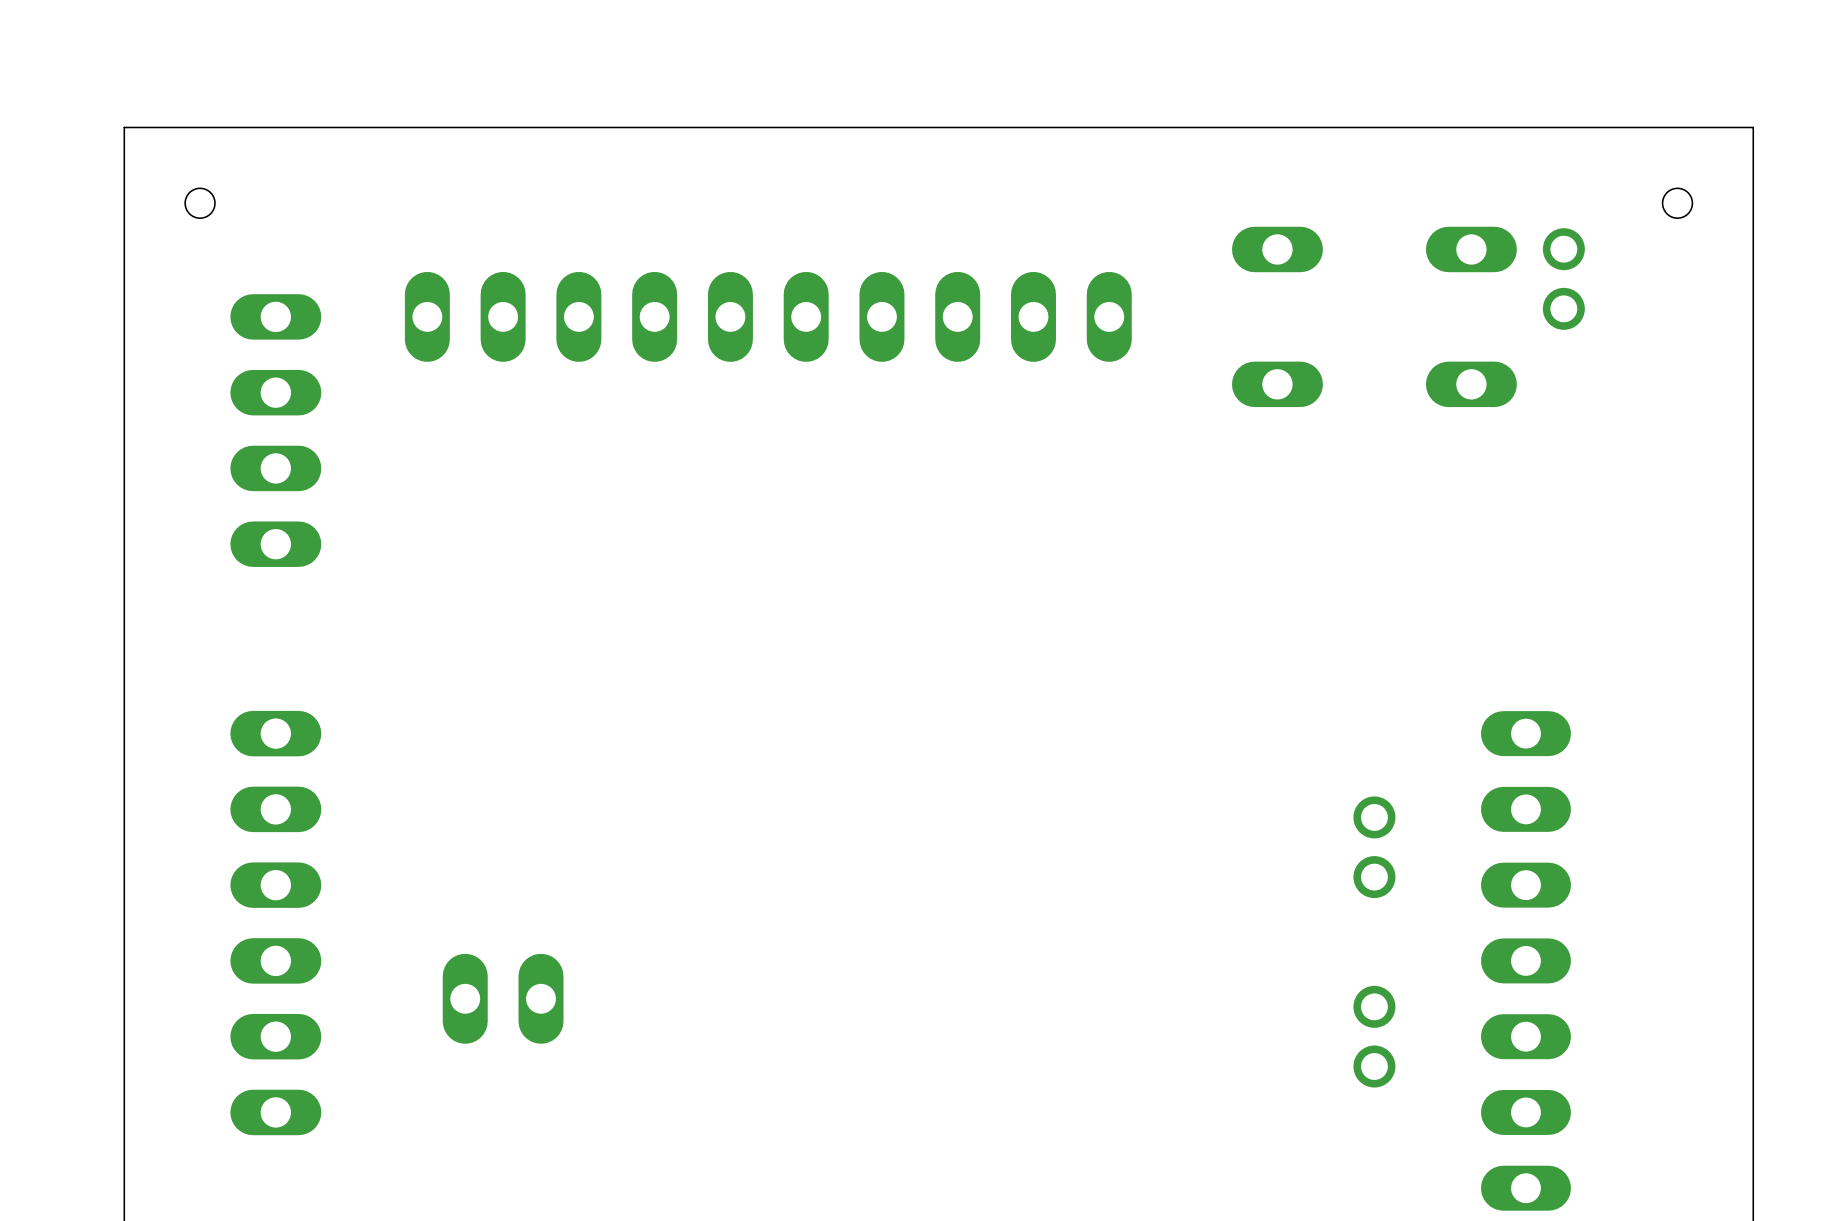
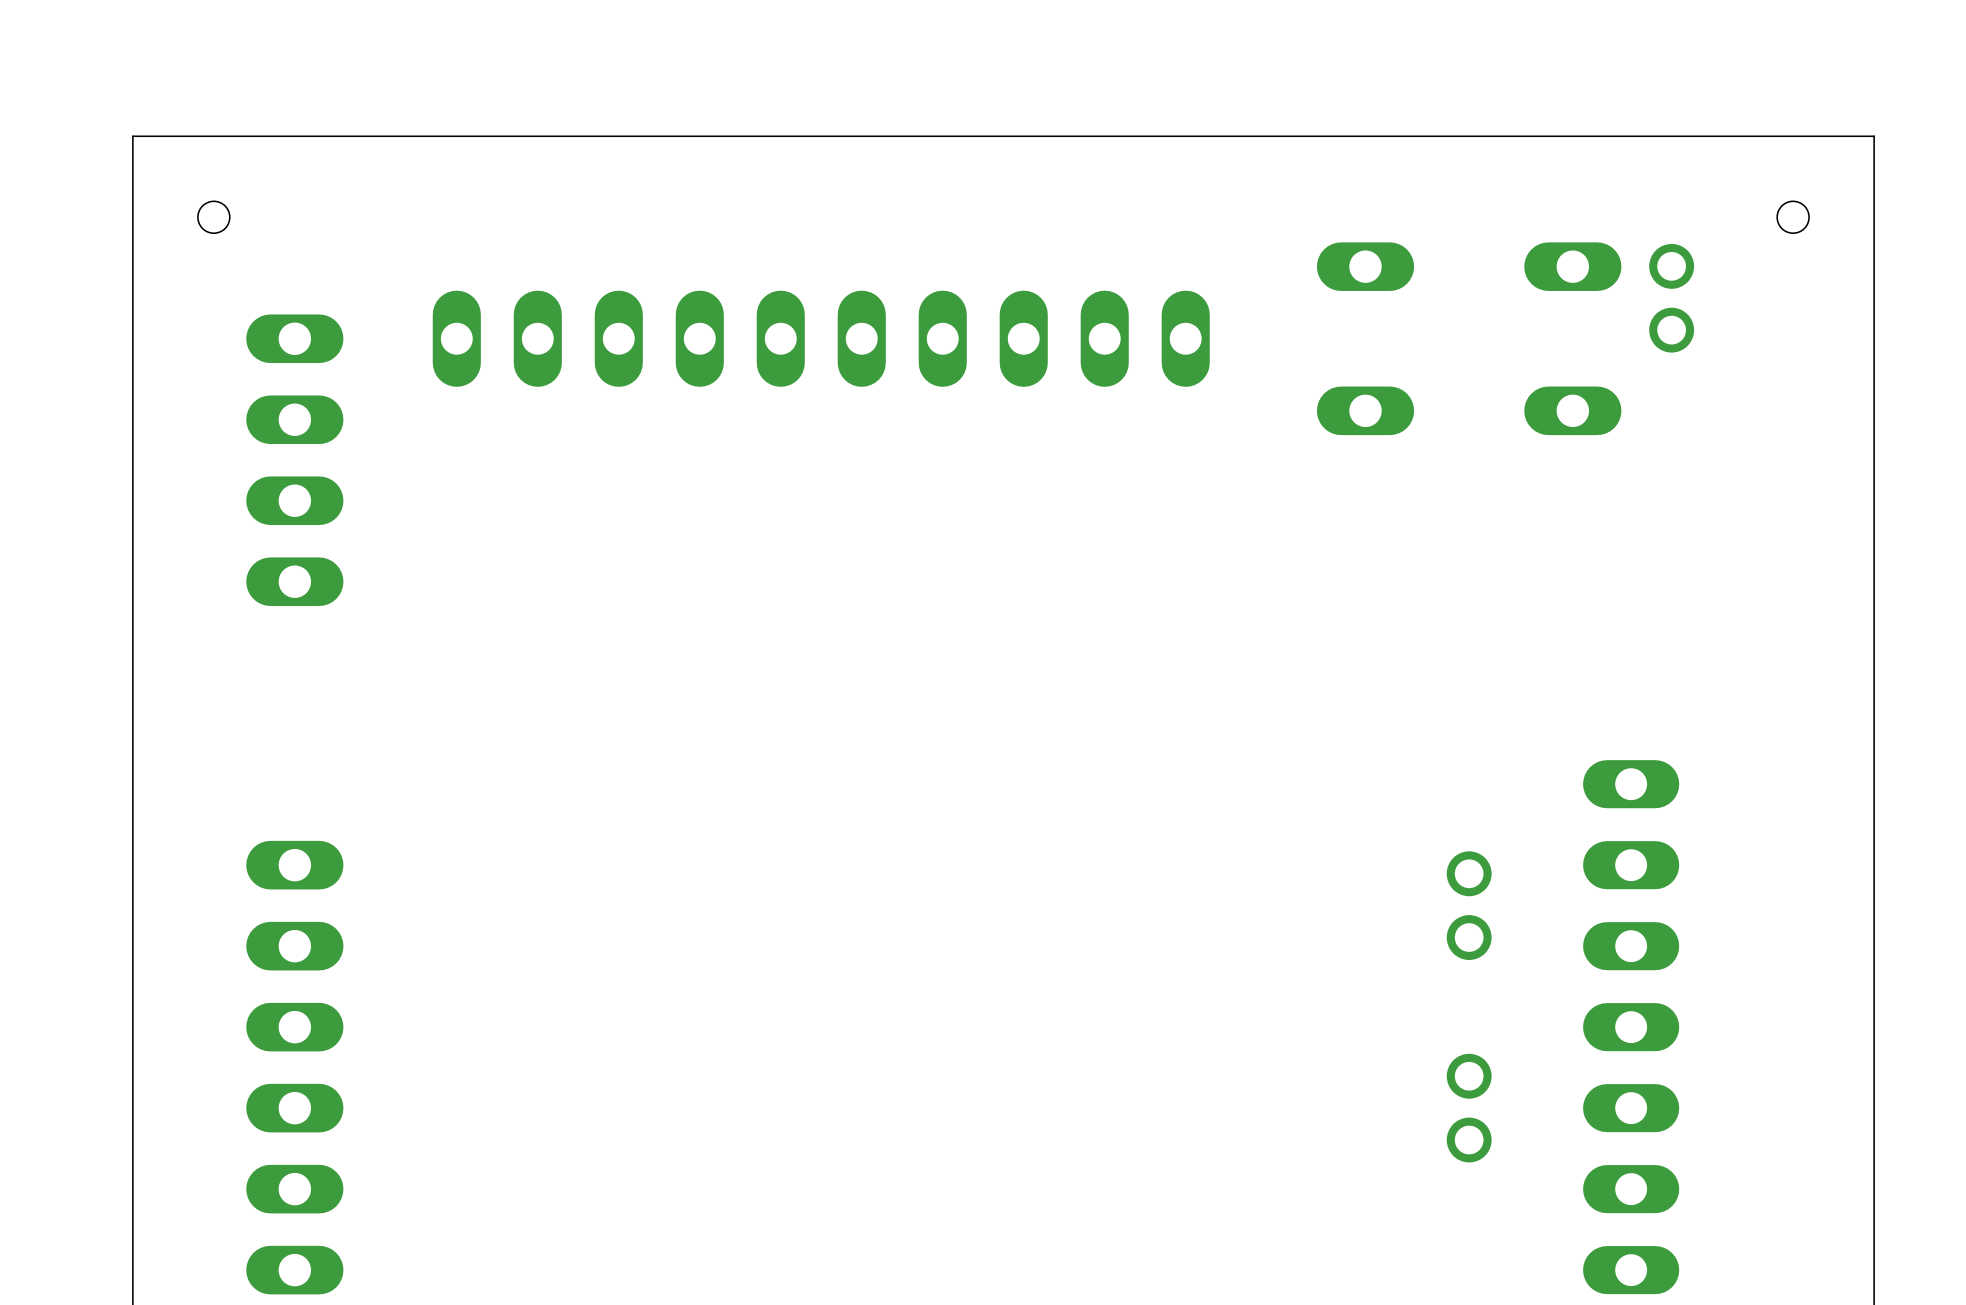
part position: (275, 923) -> (294, 1067)
part: (503, 998) -> none

